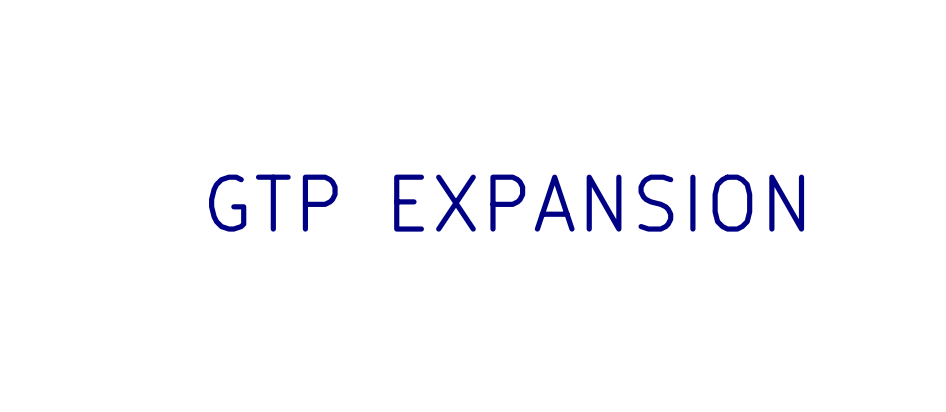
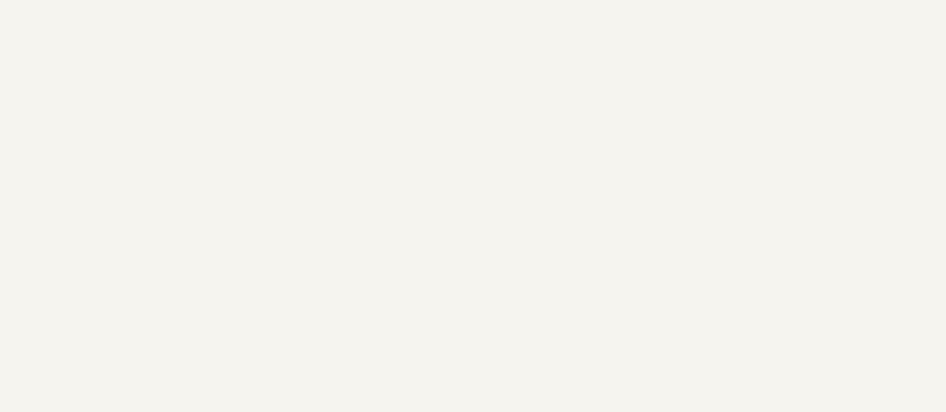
text: GTP EXPANSION (506, 203) -> none

